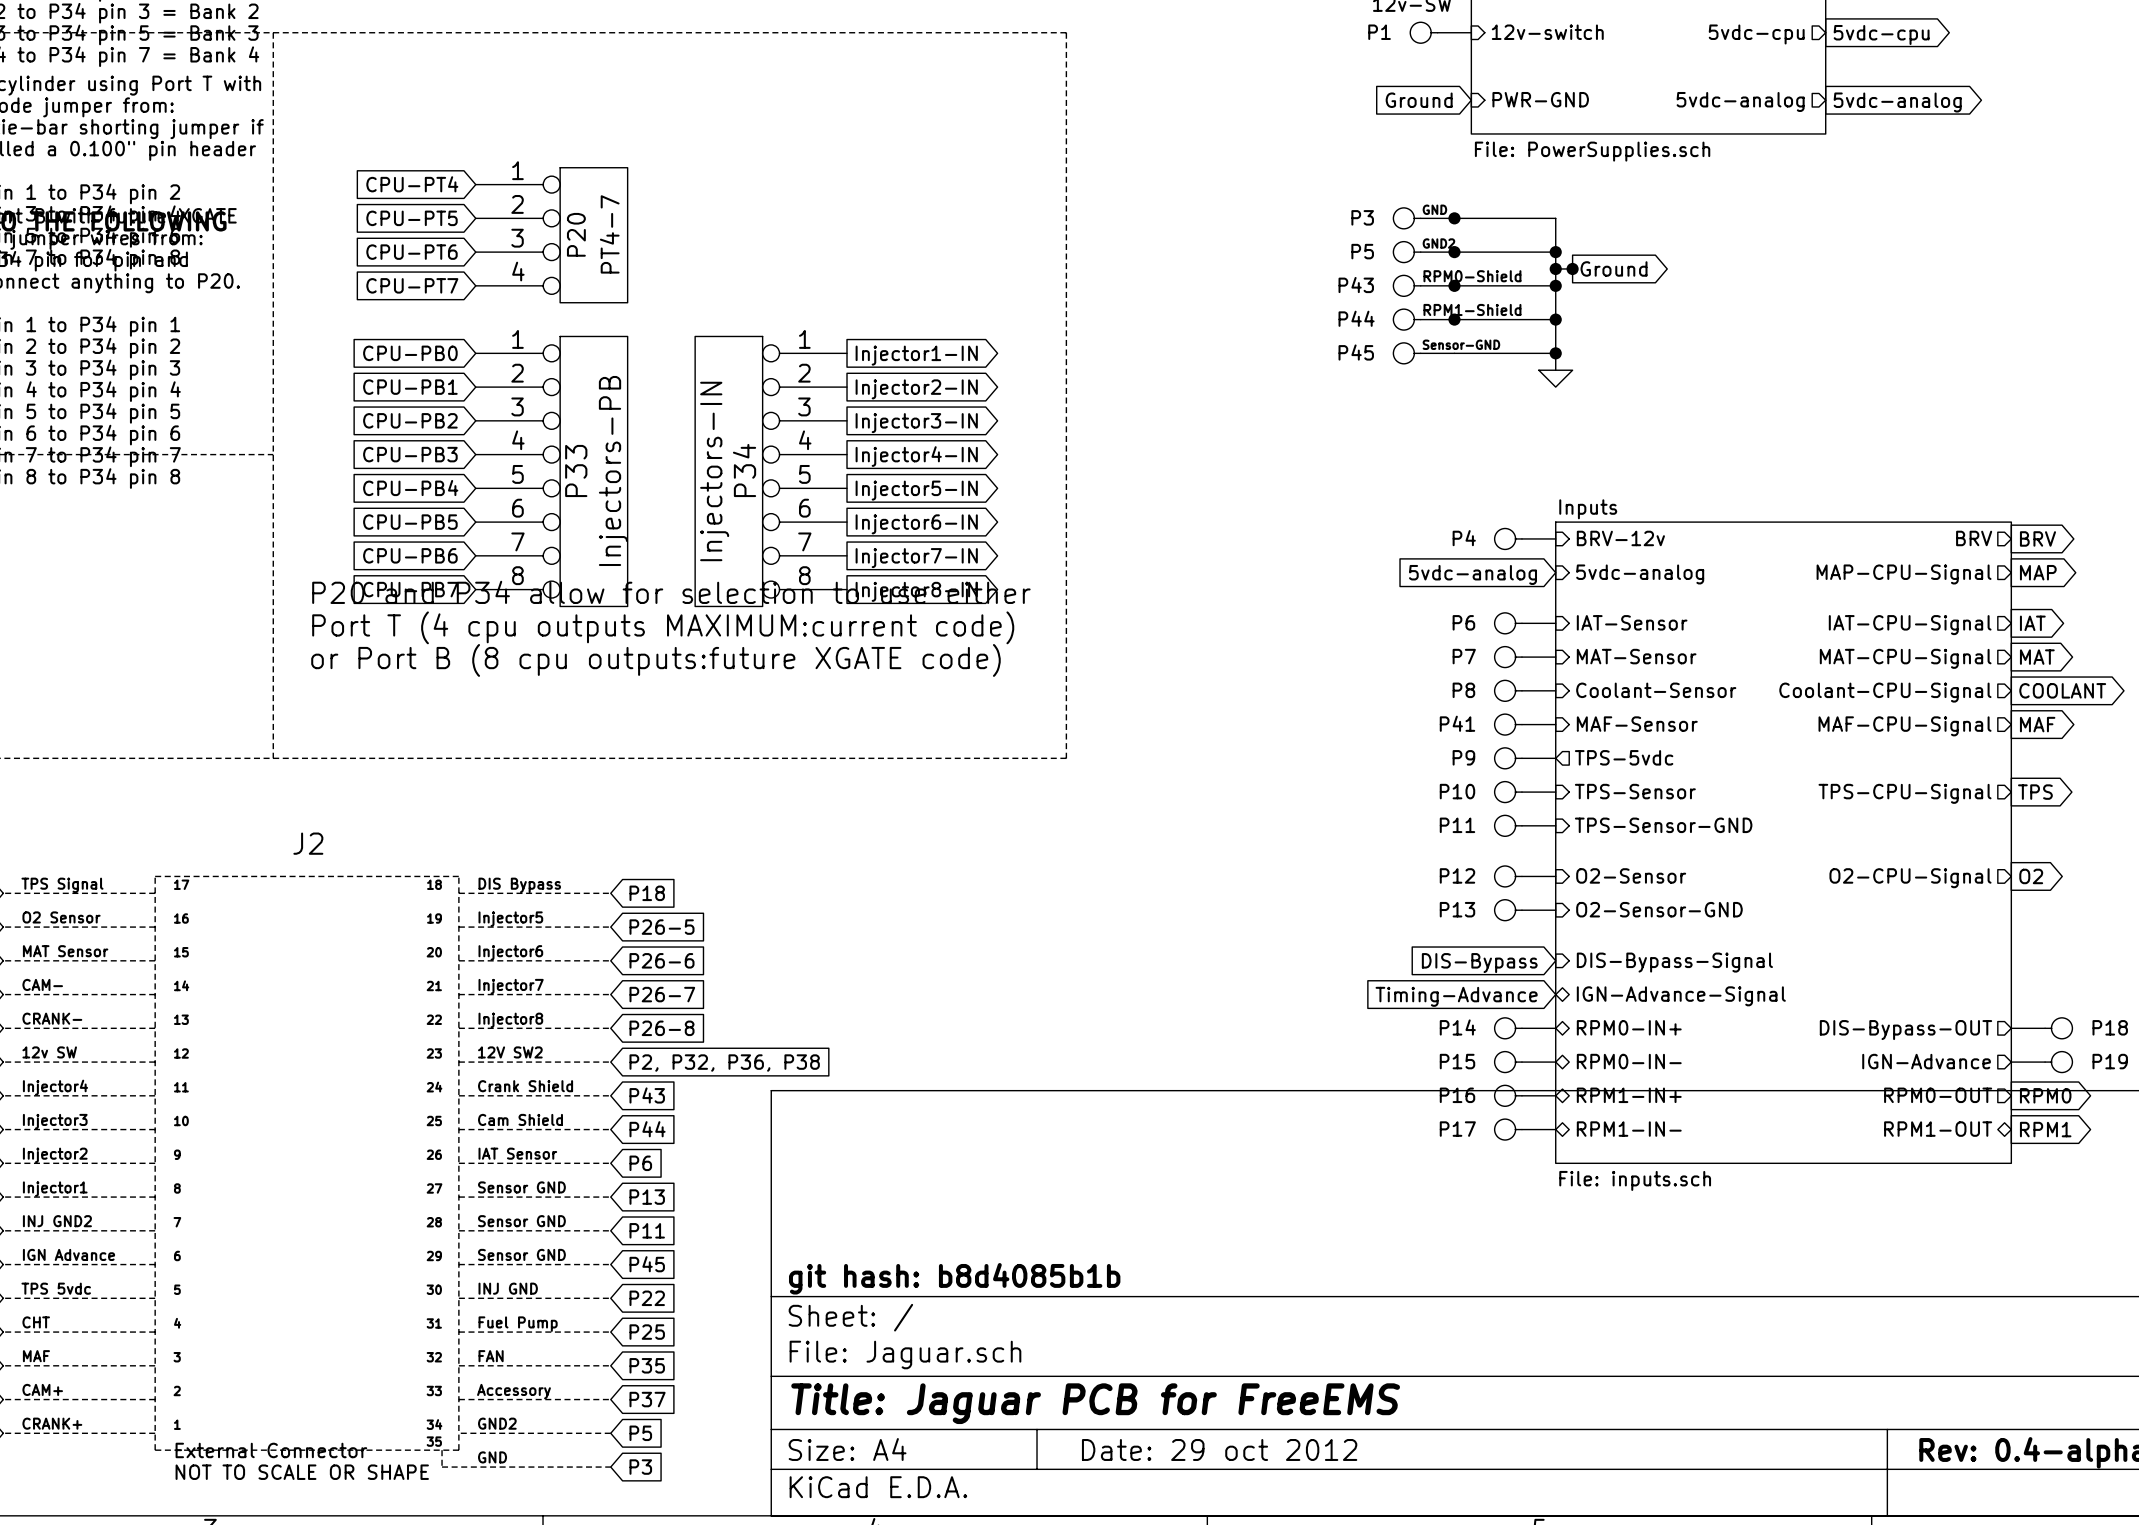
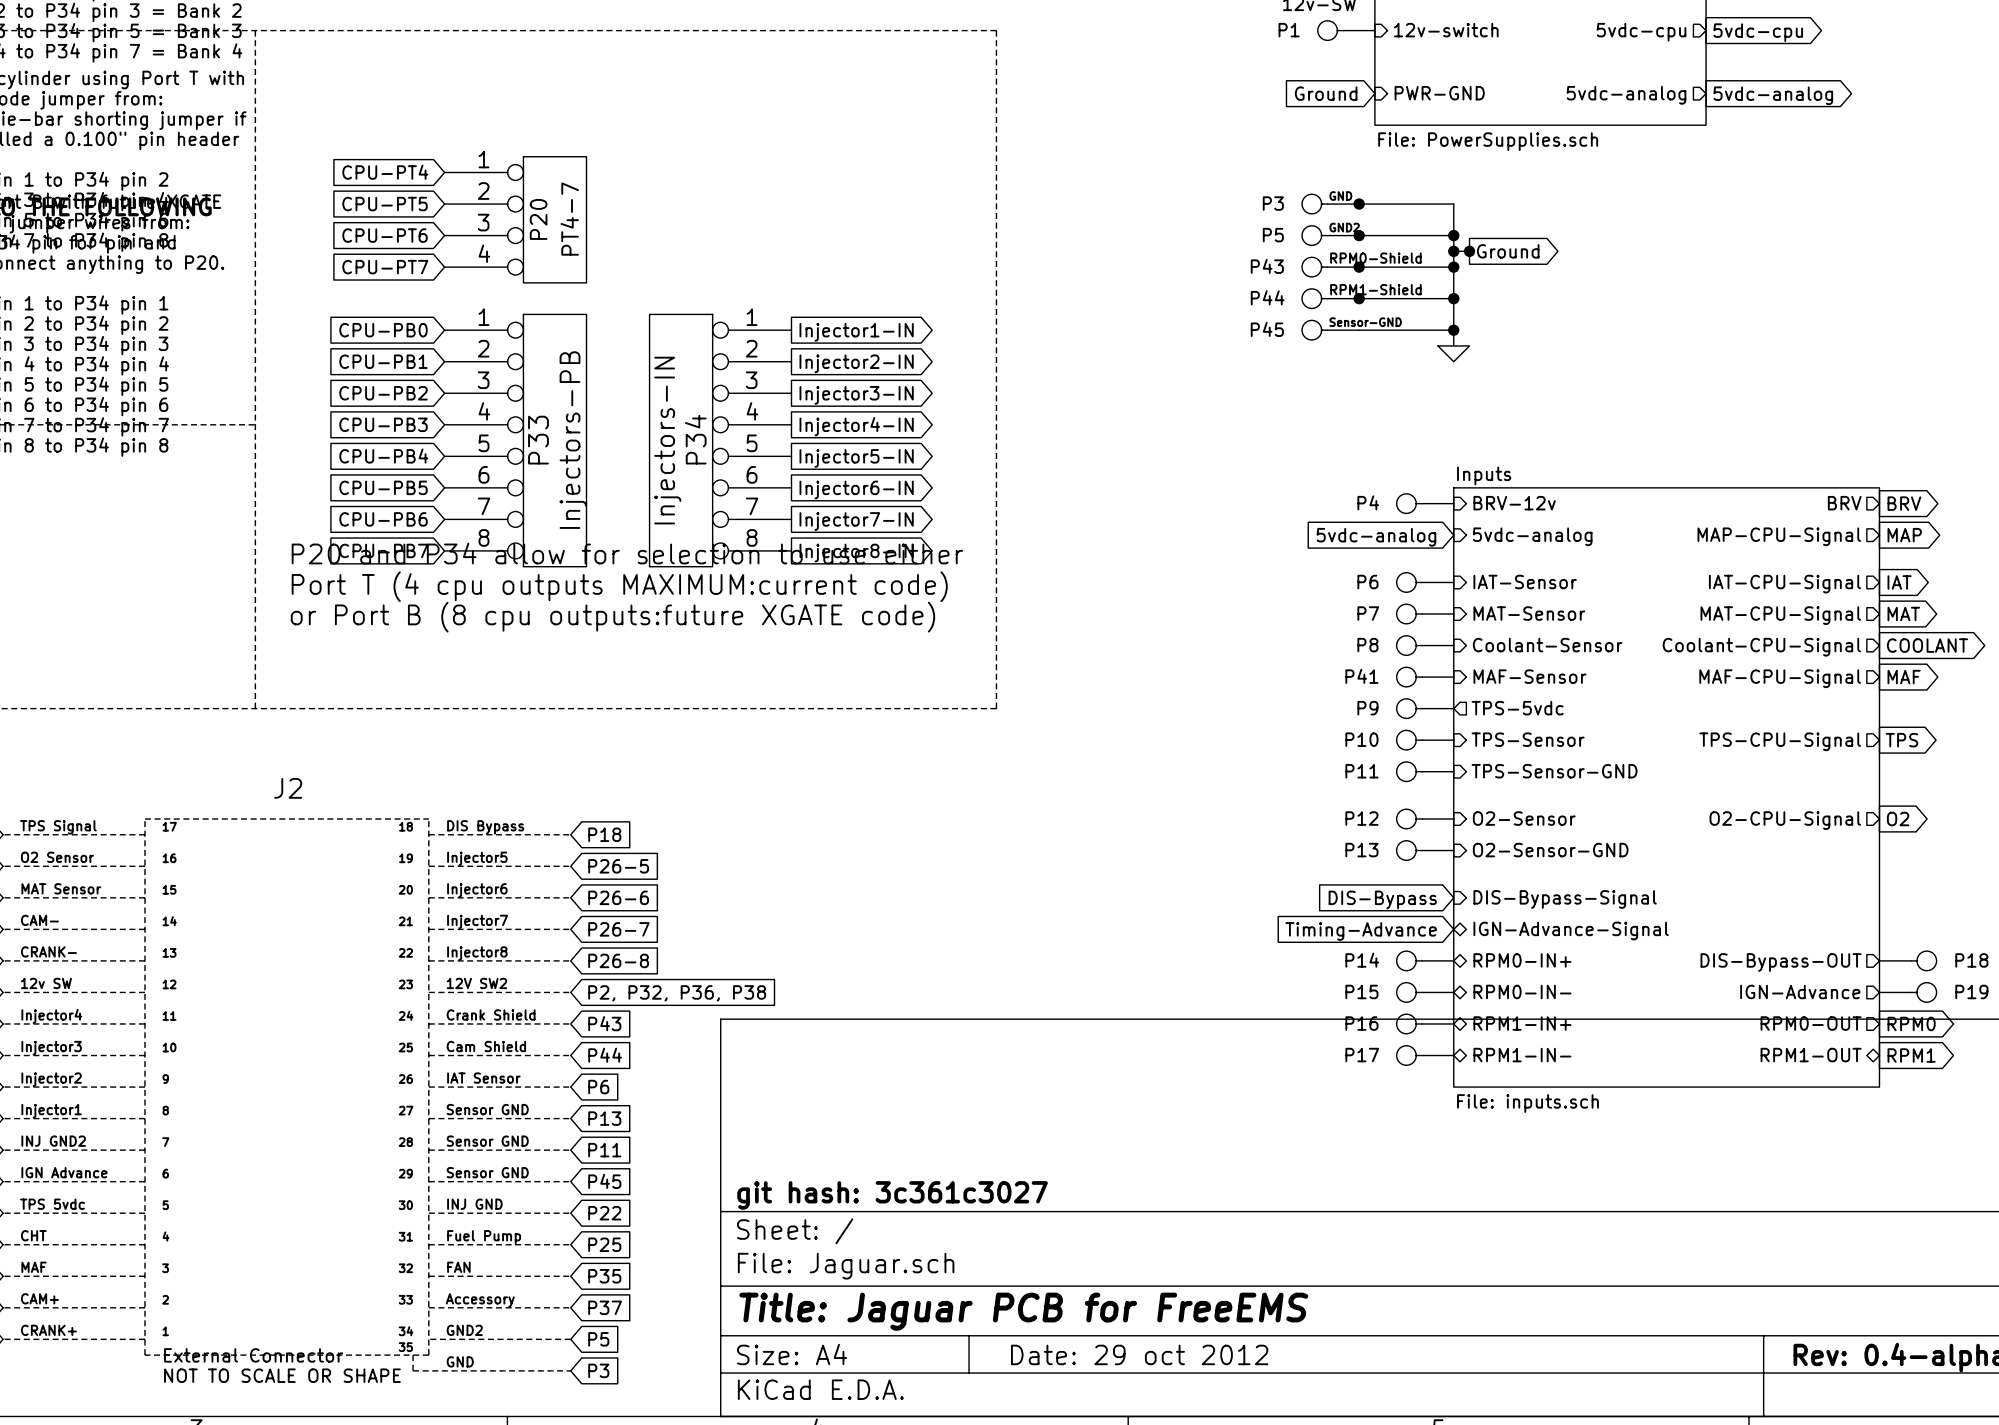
title block: git hash: b8d4085b1b (954, 1278) -> git hash: 3c361c3027 (892, 1195)

